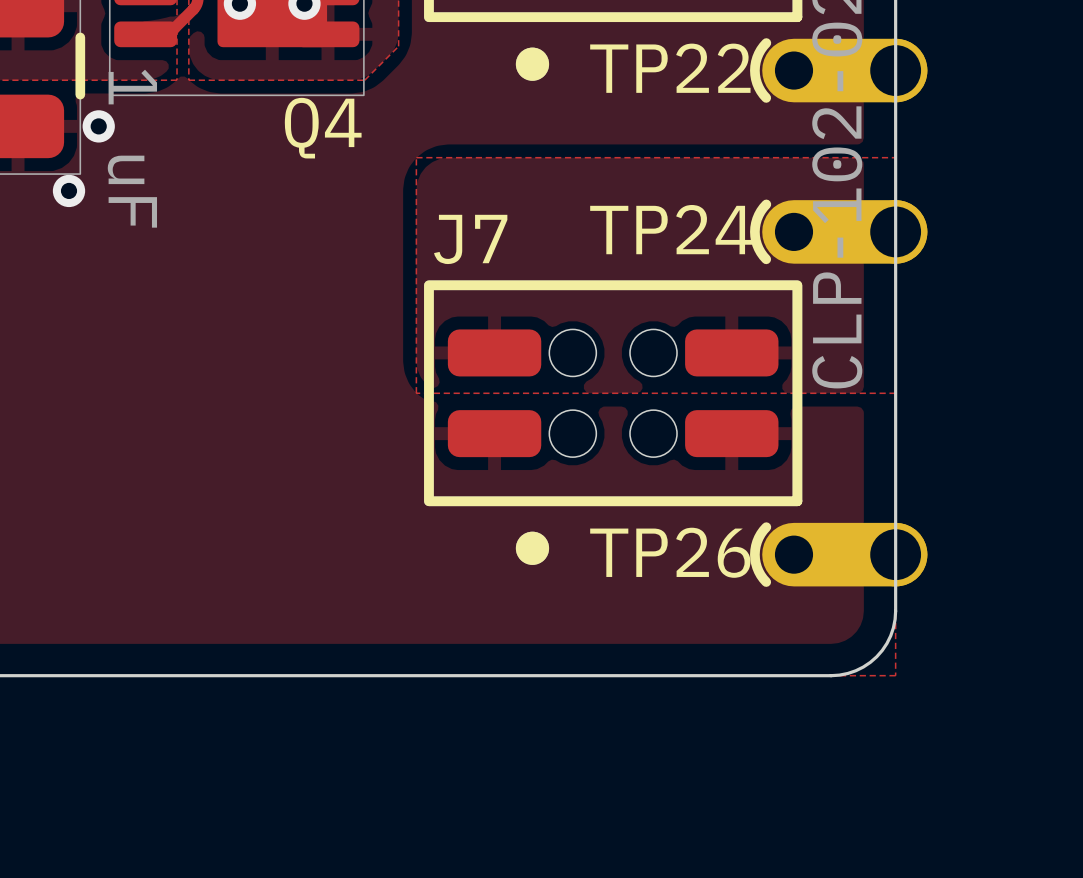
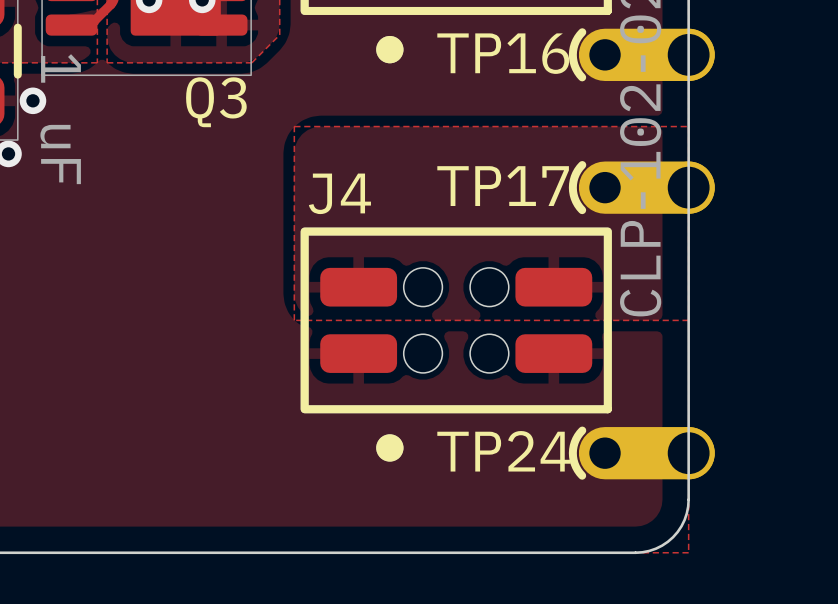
TP22 name: TP22 (670, 68) -> TP16 (503, 53)
Q4 name: Q4 (323, 128) -> Q3 (216, 102)
TP24 name: TP24 (671, 229) -> TP17 (503, 186)
J7 name: J7 (470, 239) -> J4 (339, 193)
TP26 name: TP26 (670, 552) -> TP24 (504, 451)

